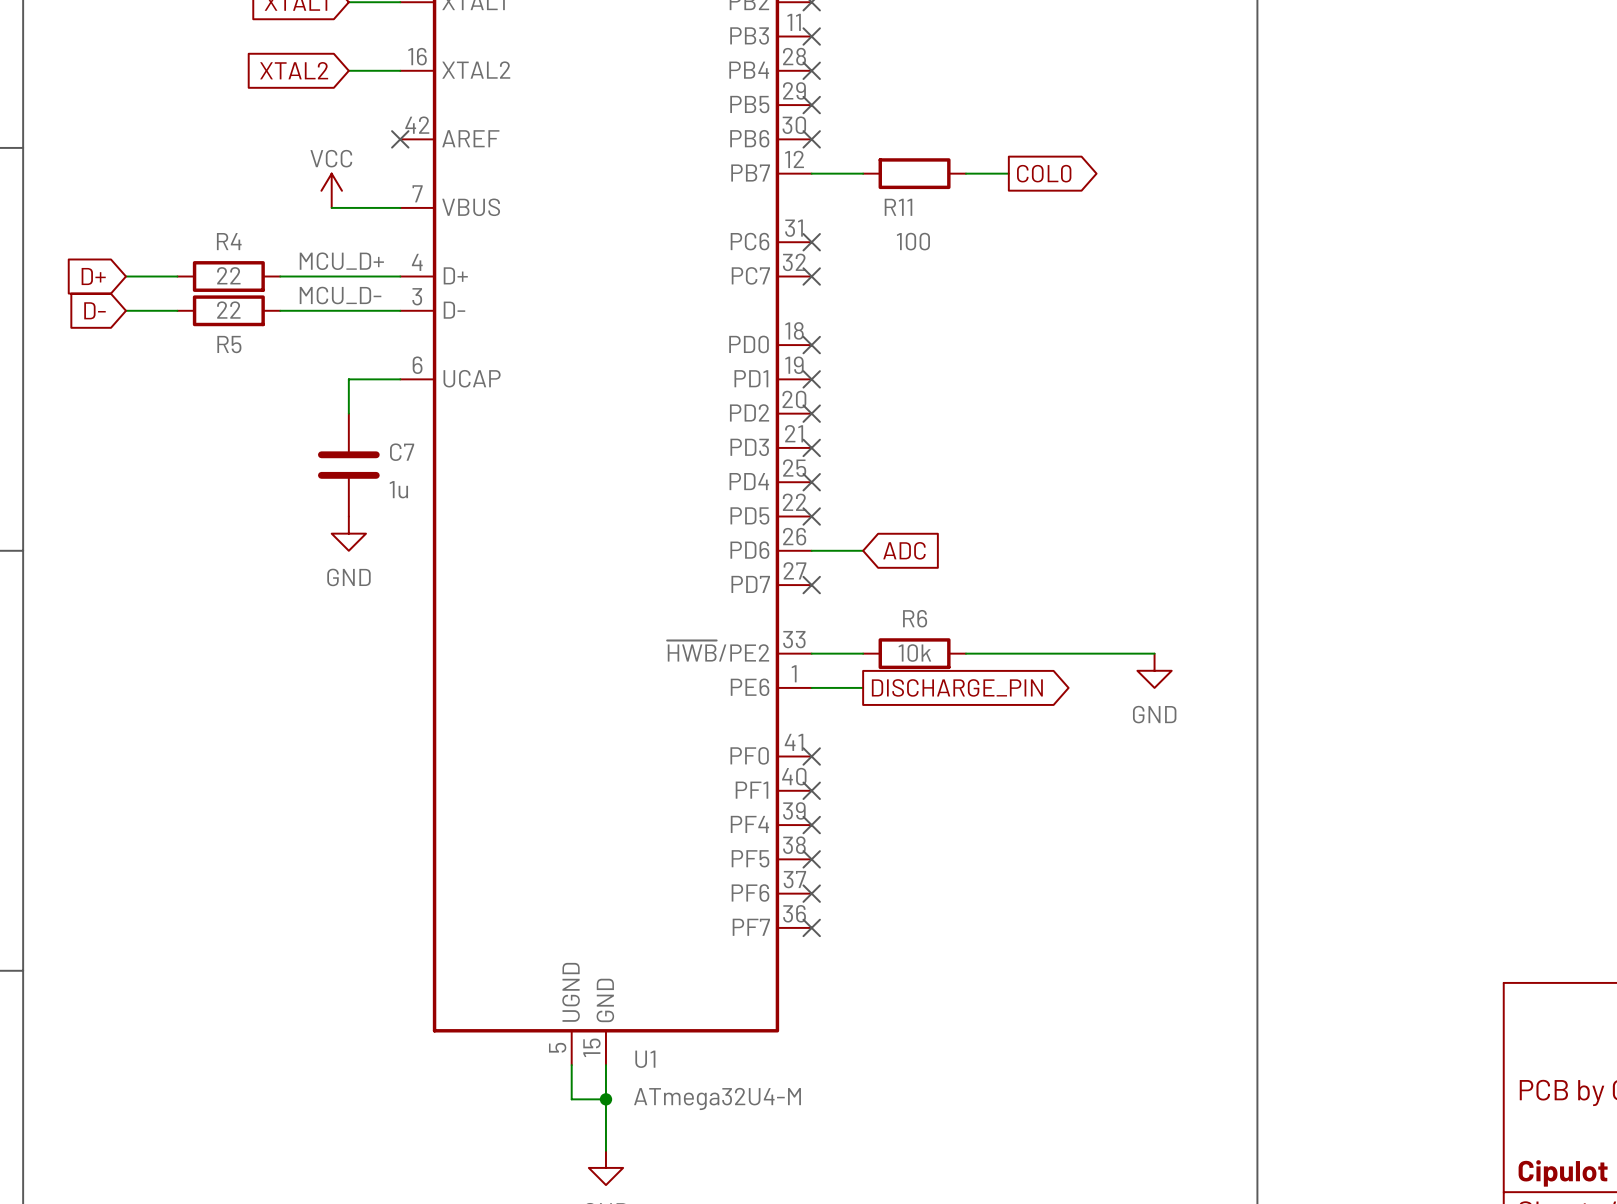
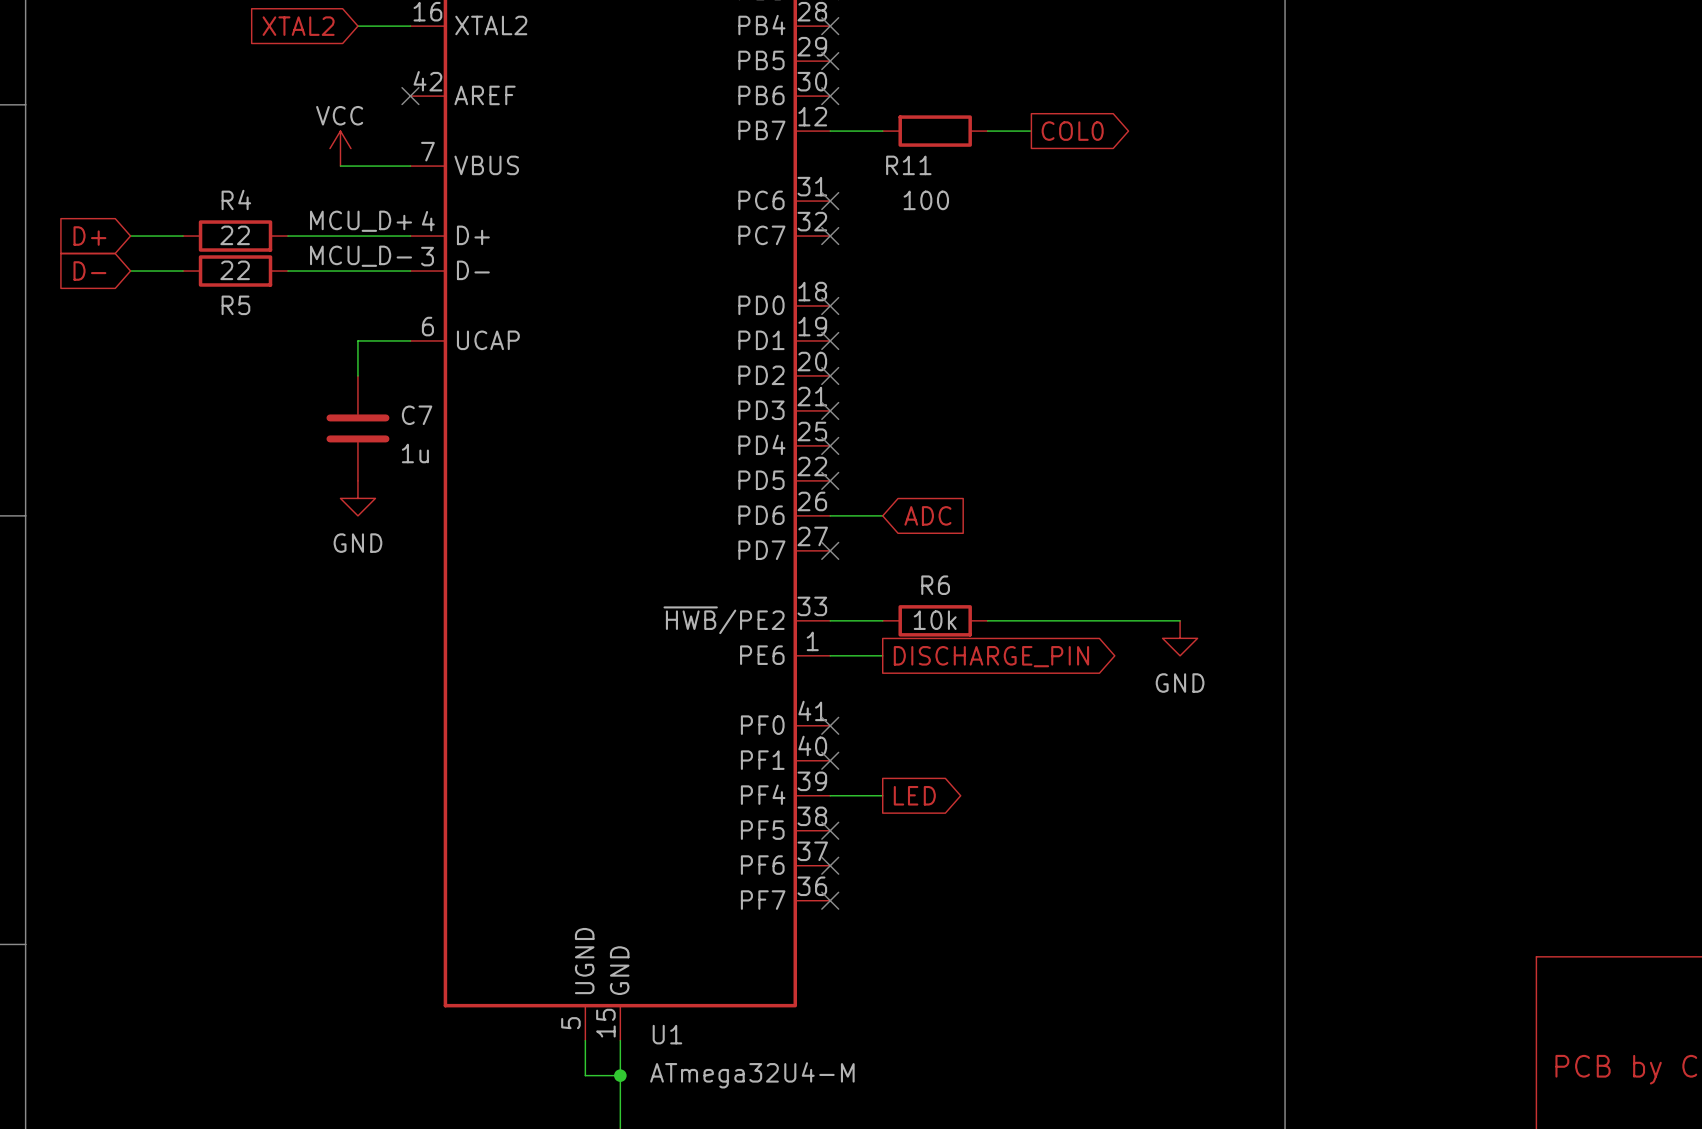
wire: none -> (830, 795) (882, 795)
no-connect mark: (811, 825) -> none
global label: none -> LED (914, 795)

